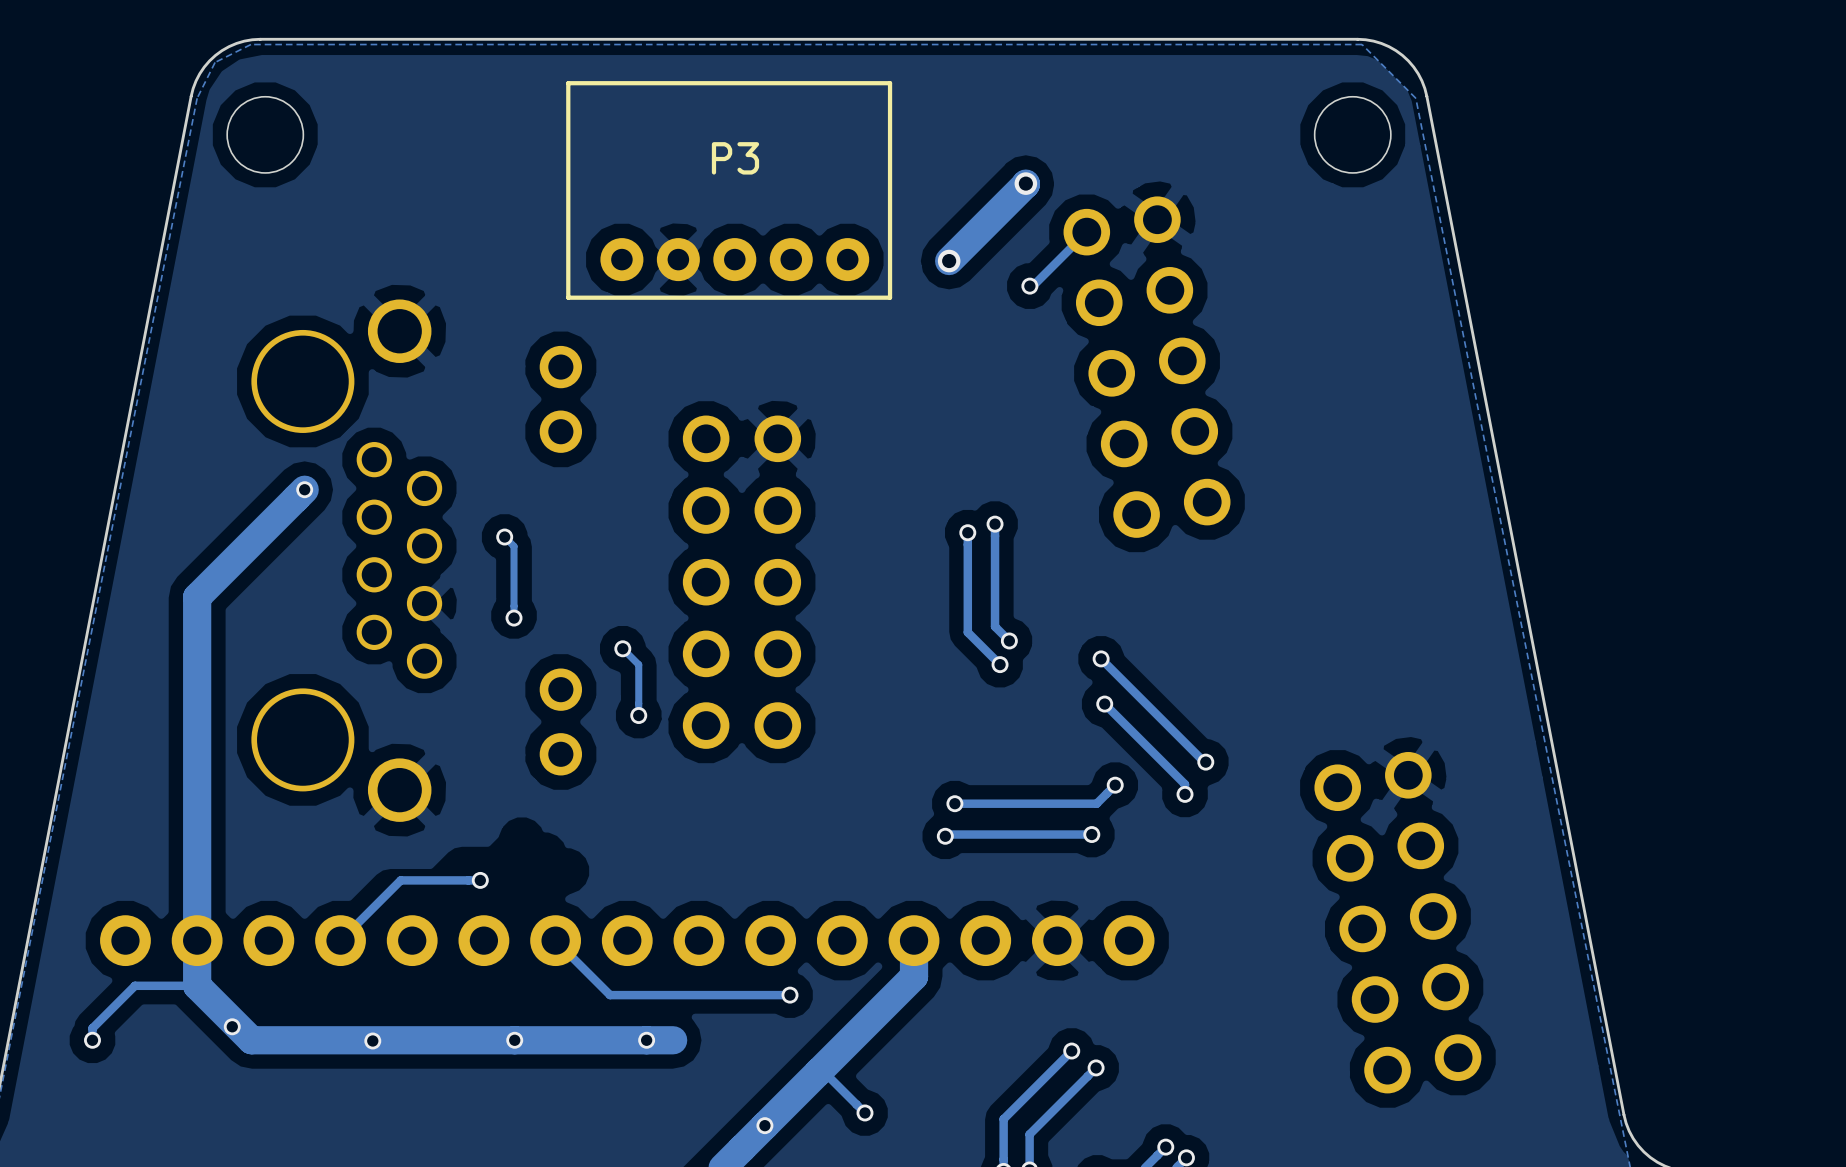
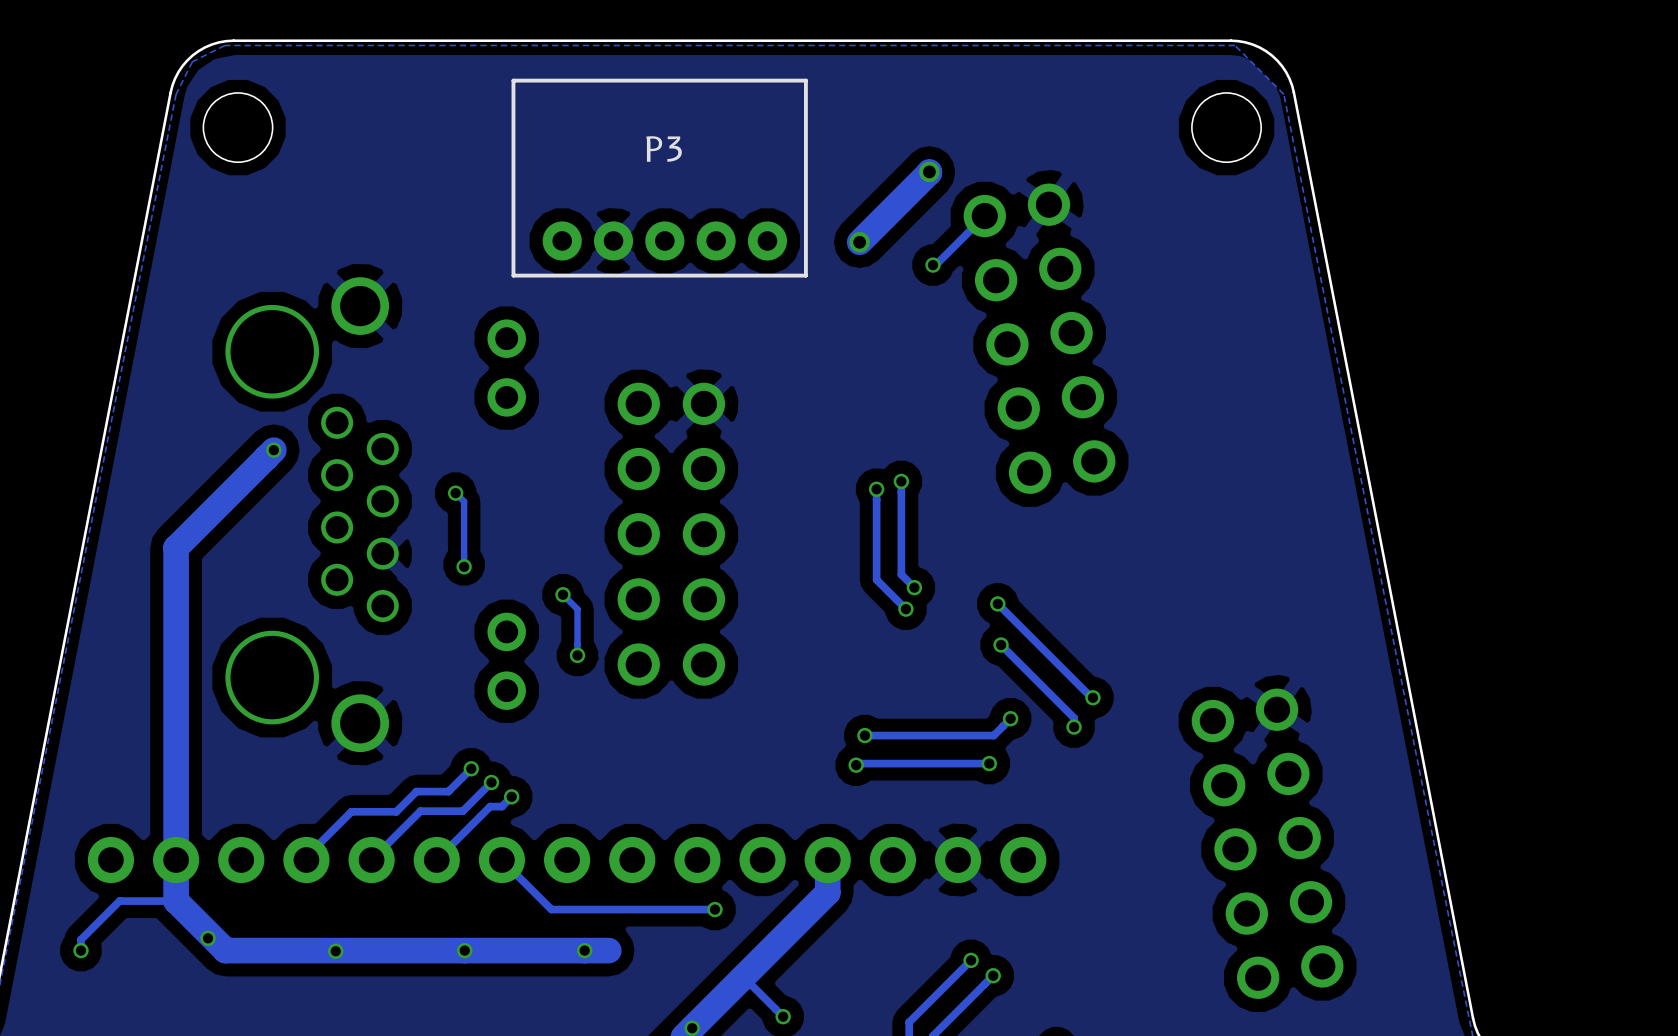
via: none -> (471, 768)
track: none -> (491, 782) (462, 811) (420, 811) (371, 860)
via: none -> (491, 782)
track: none -> (511, 796) (501, 806) (490, 806) (436, 860)
via: none -> (511, 796)
track: (480, 880) (400, 880) (340, 940) -> (471, 768) (448, 791) (416, 791) (396, 811) (351, 811) (306, 856) (306, 860)
via: (480, 880) -> none

